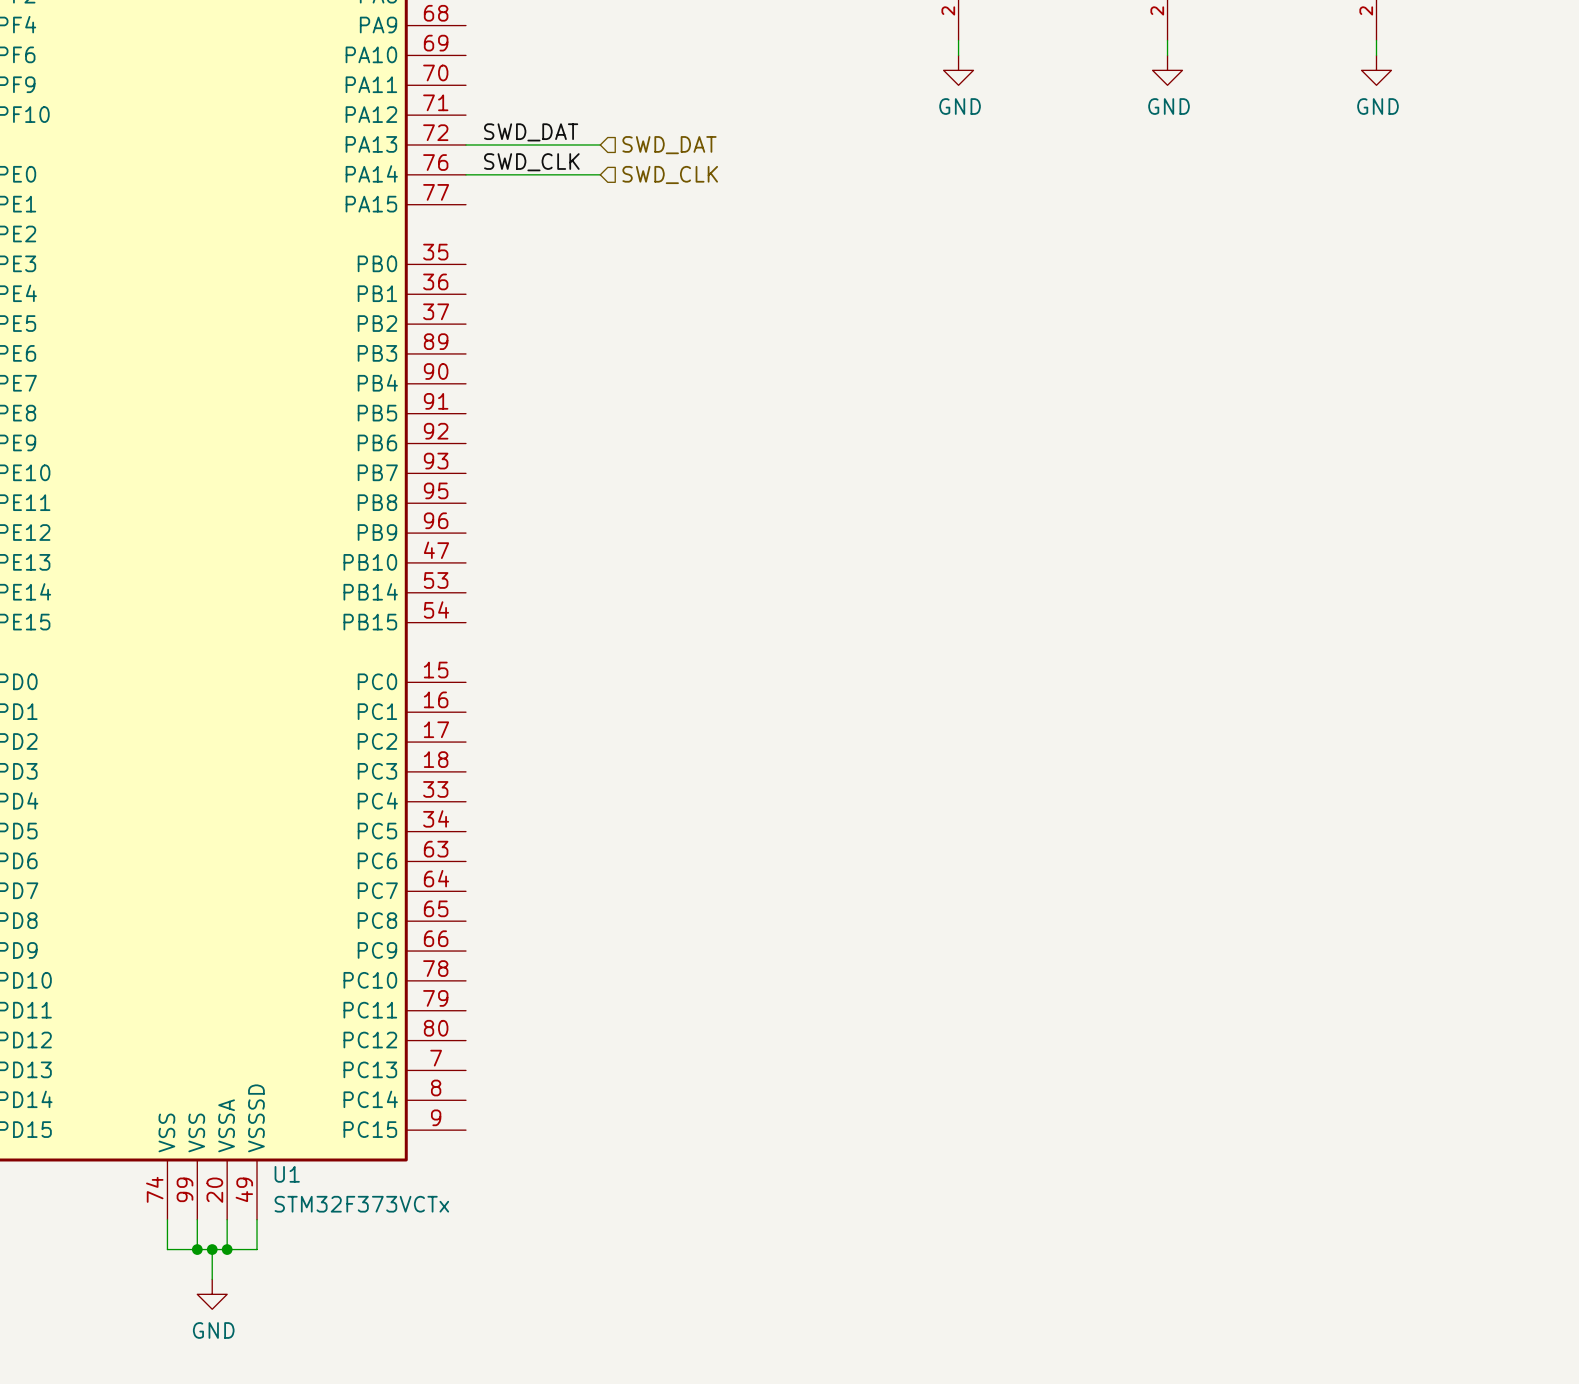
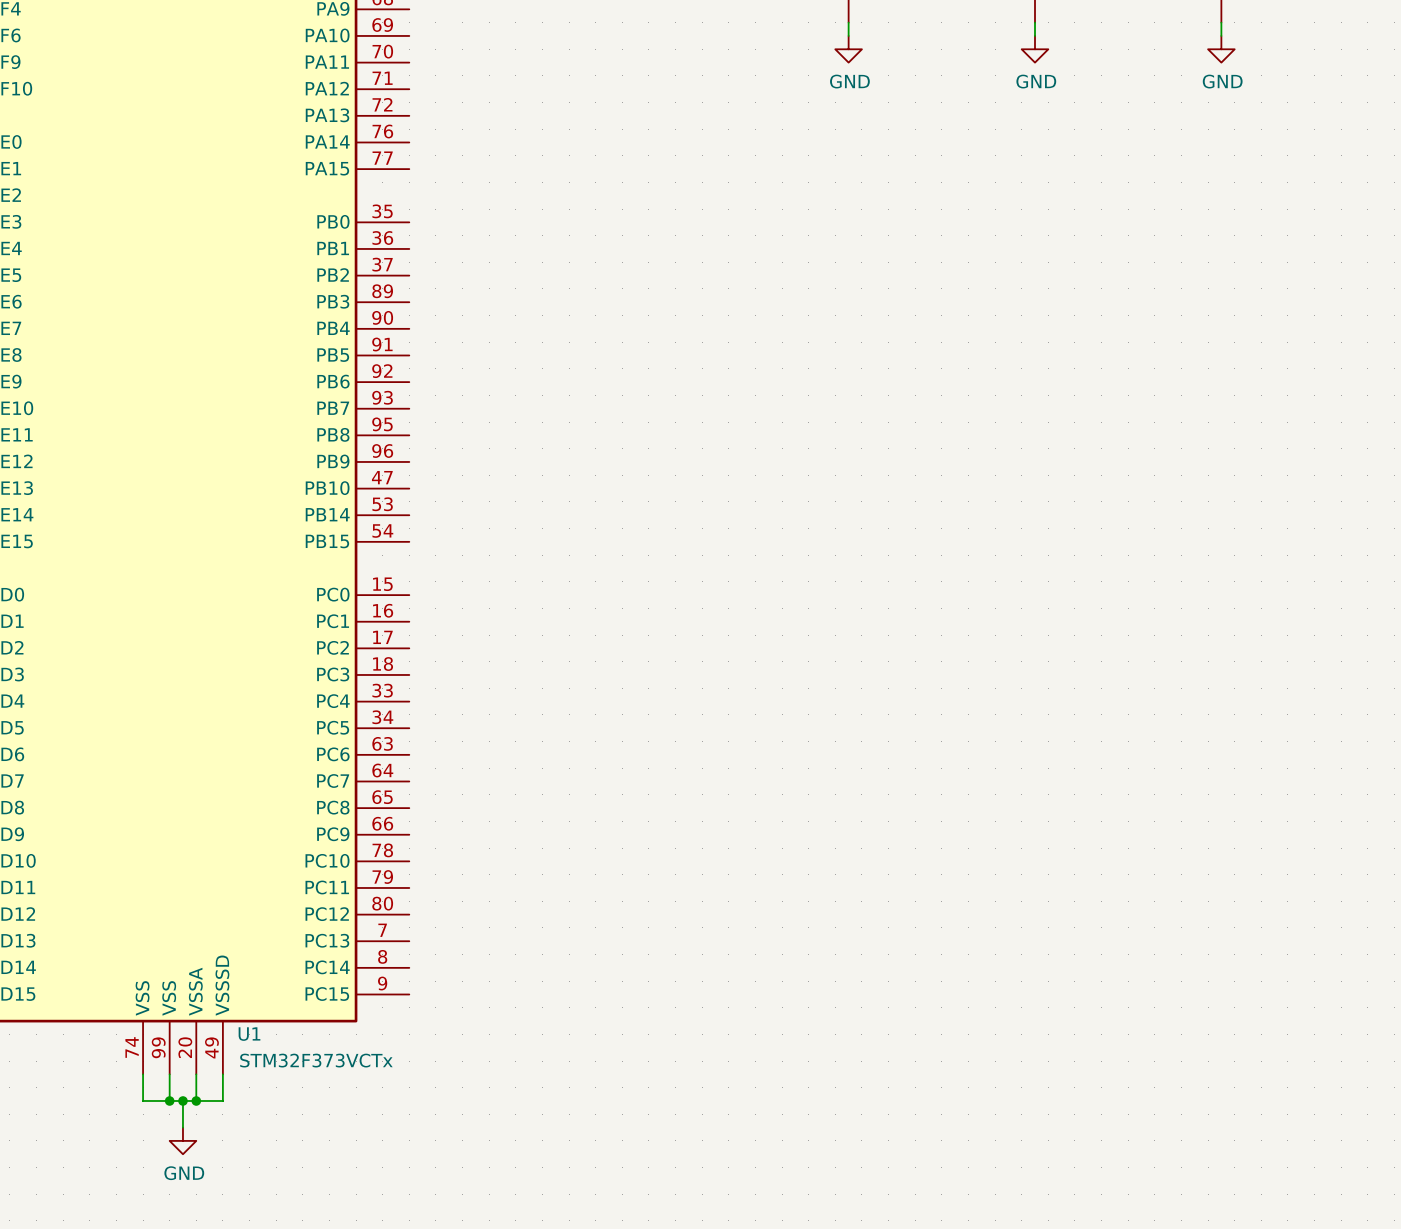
label: SWD_DAT (531, 132) -> none
wire: (465, 144) (600, 144) -> none
hierarchical label: SWD_DAT (669, 145) -> none
label: SWD_CLK (531, 162) -> none
wire: (465, 174) (600, 174) -> none
hierarchical label: SWD_CLK (670, 174) -> none

